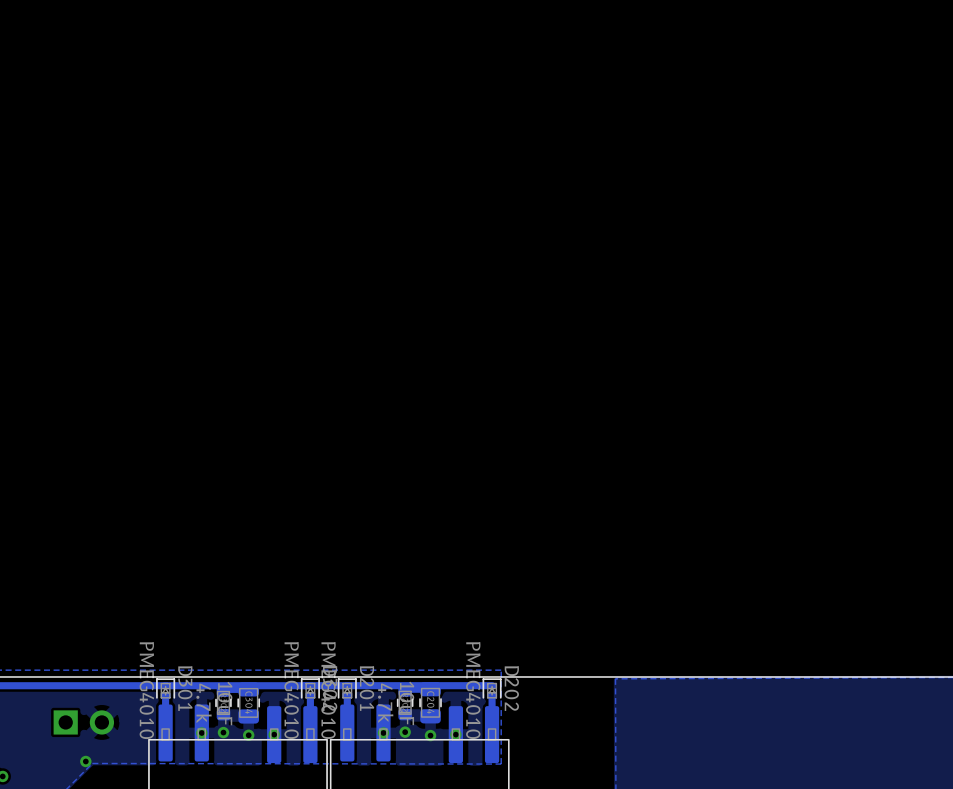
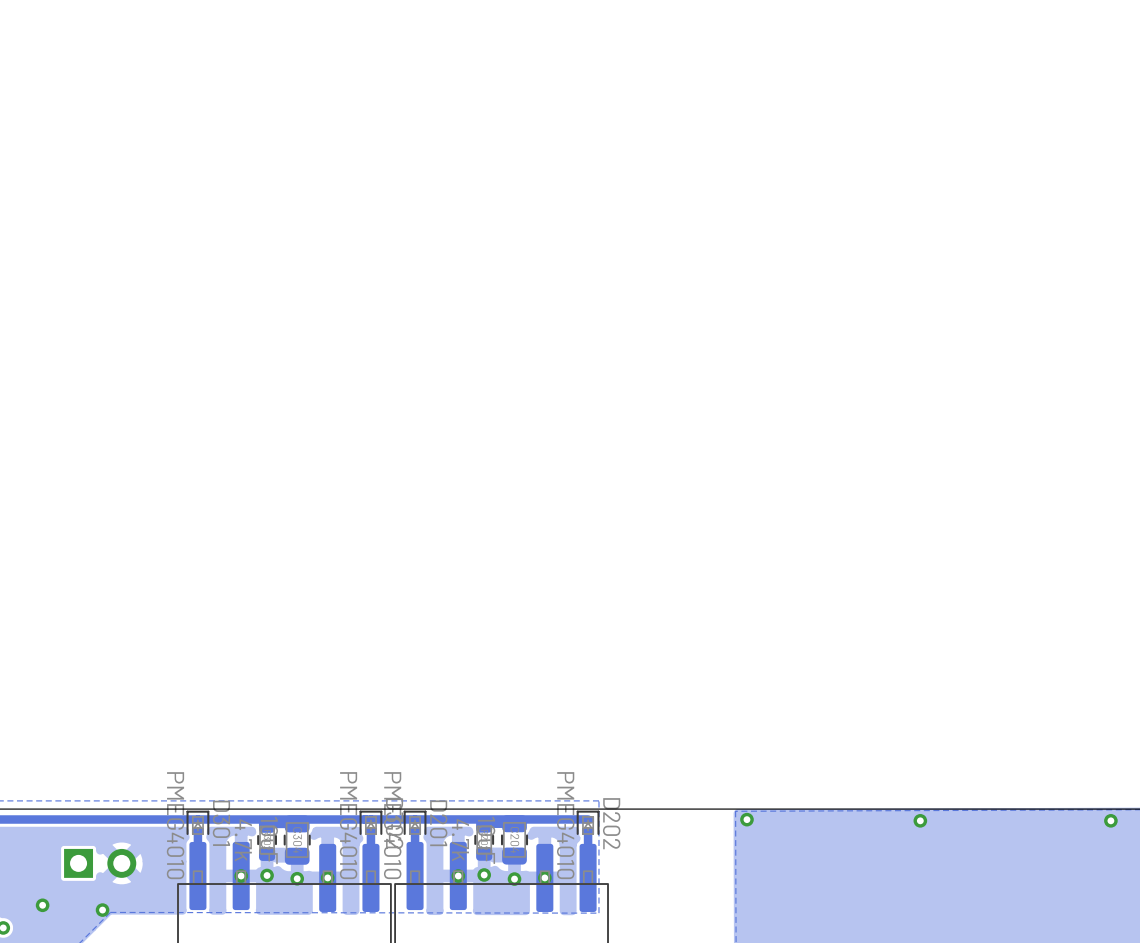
via: none -> (746, 819)
via: none -> (920, 820)
via: none -> (1110, 820)
via: none -> (42, 905)

